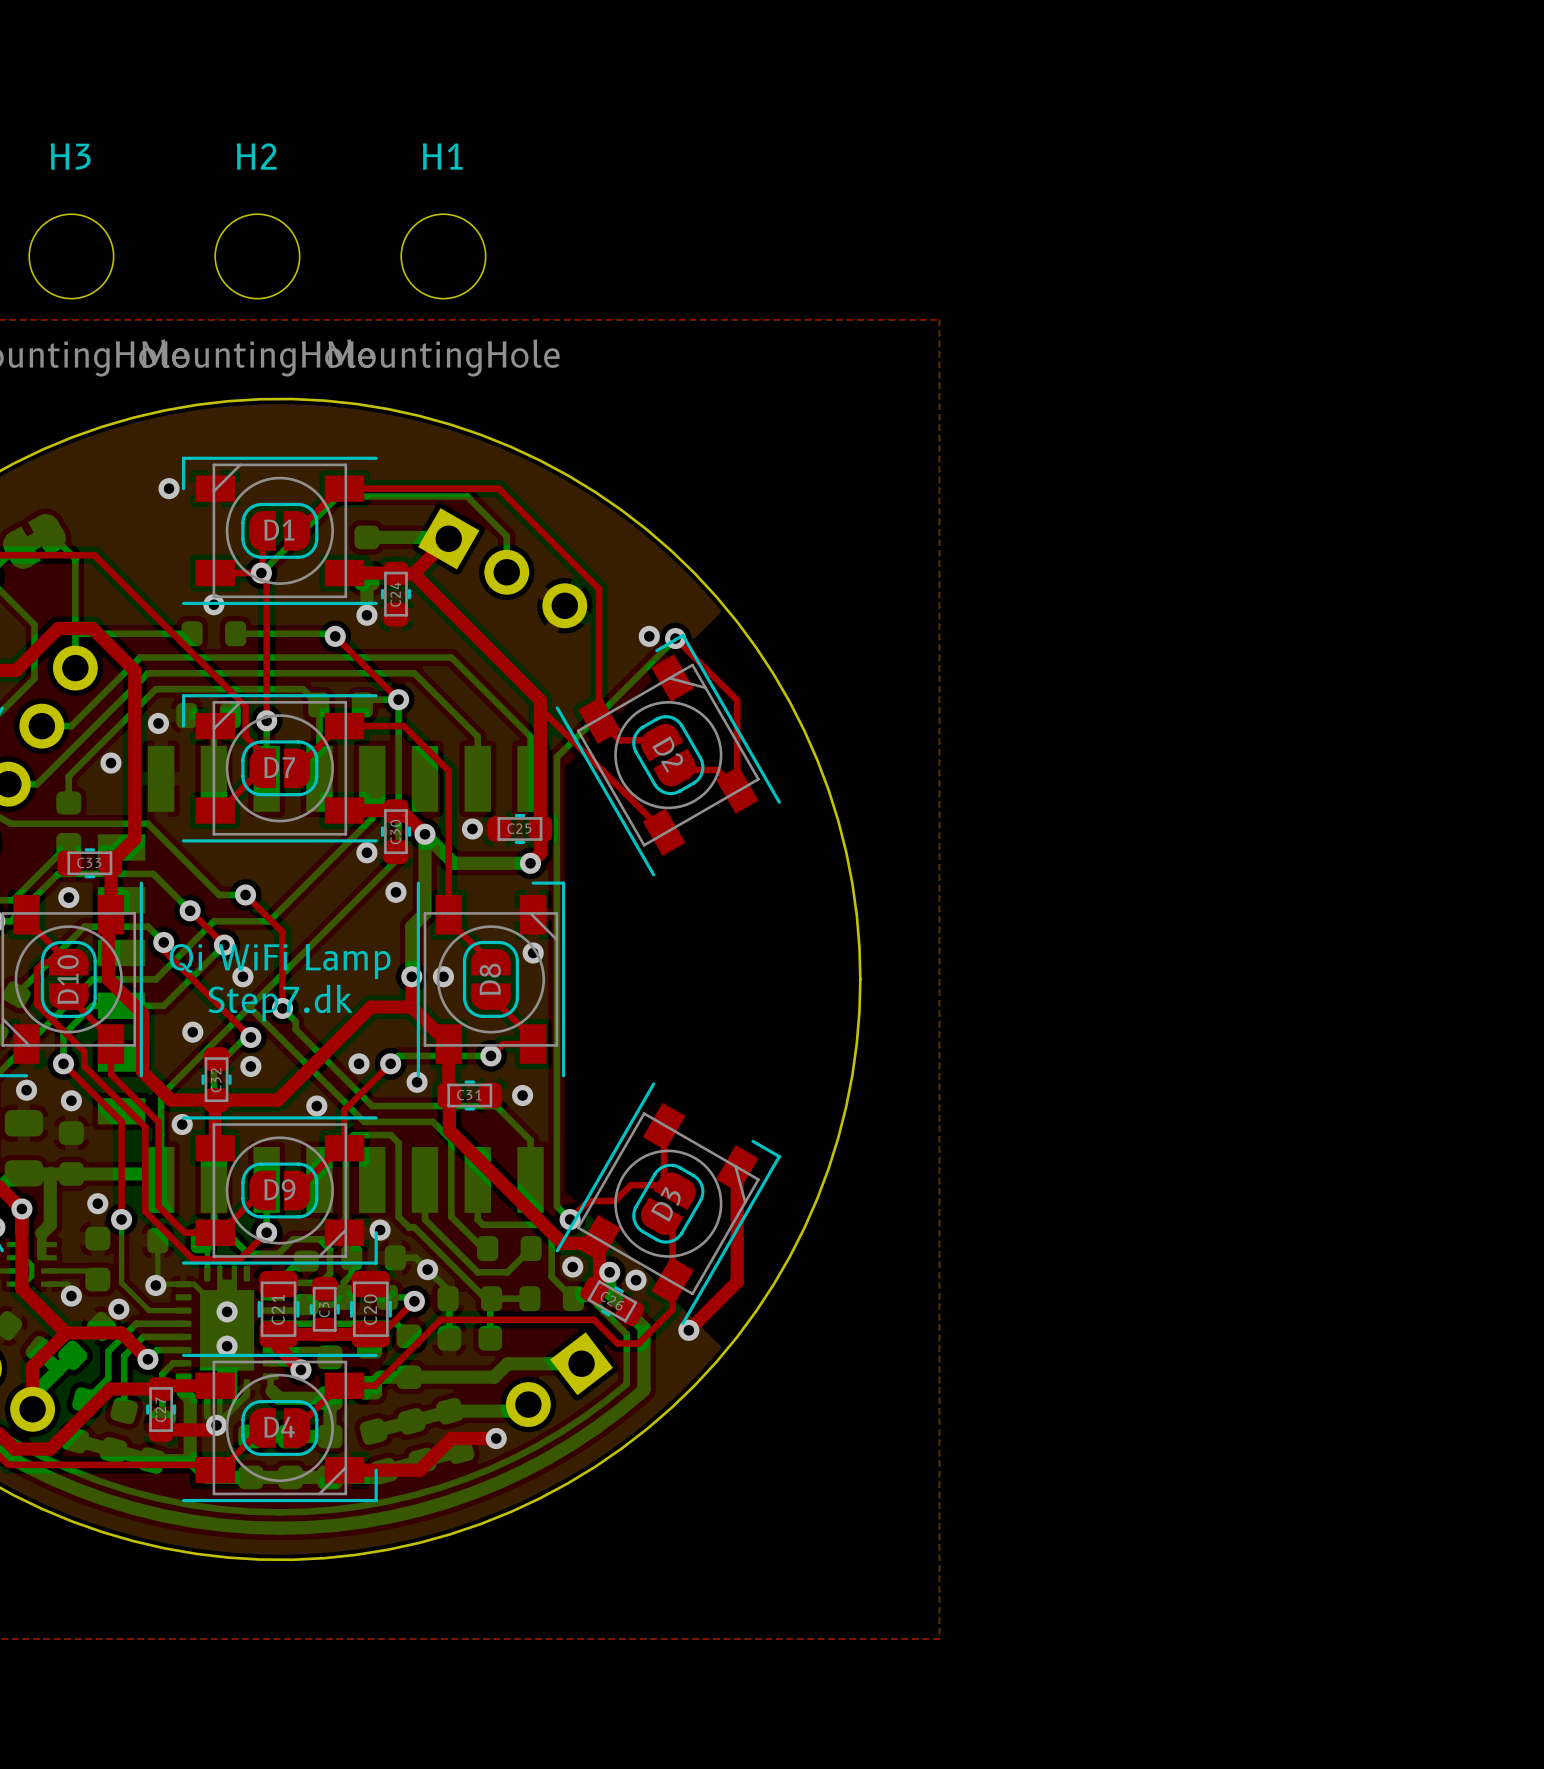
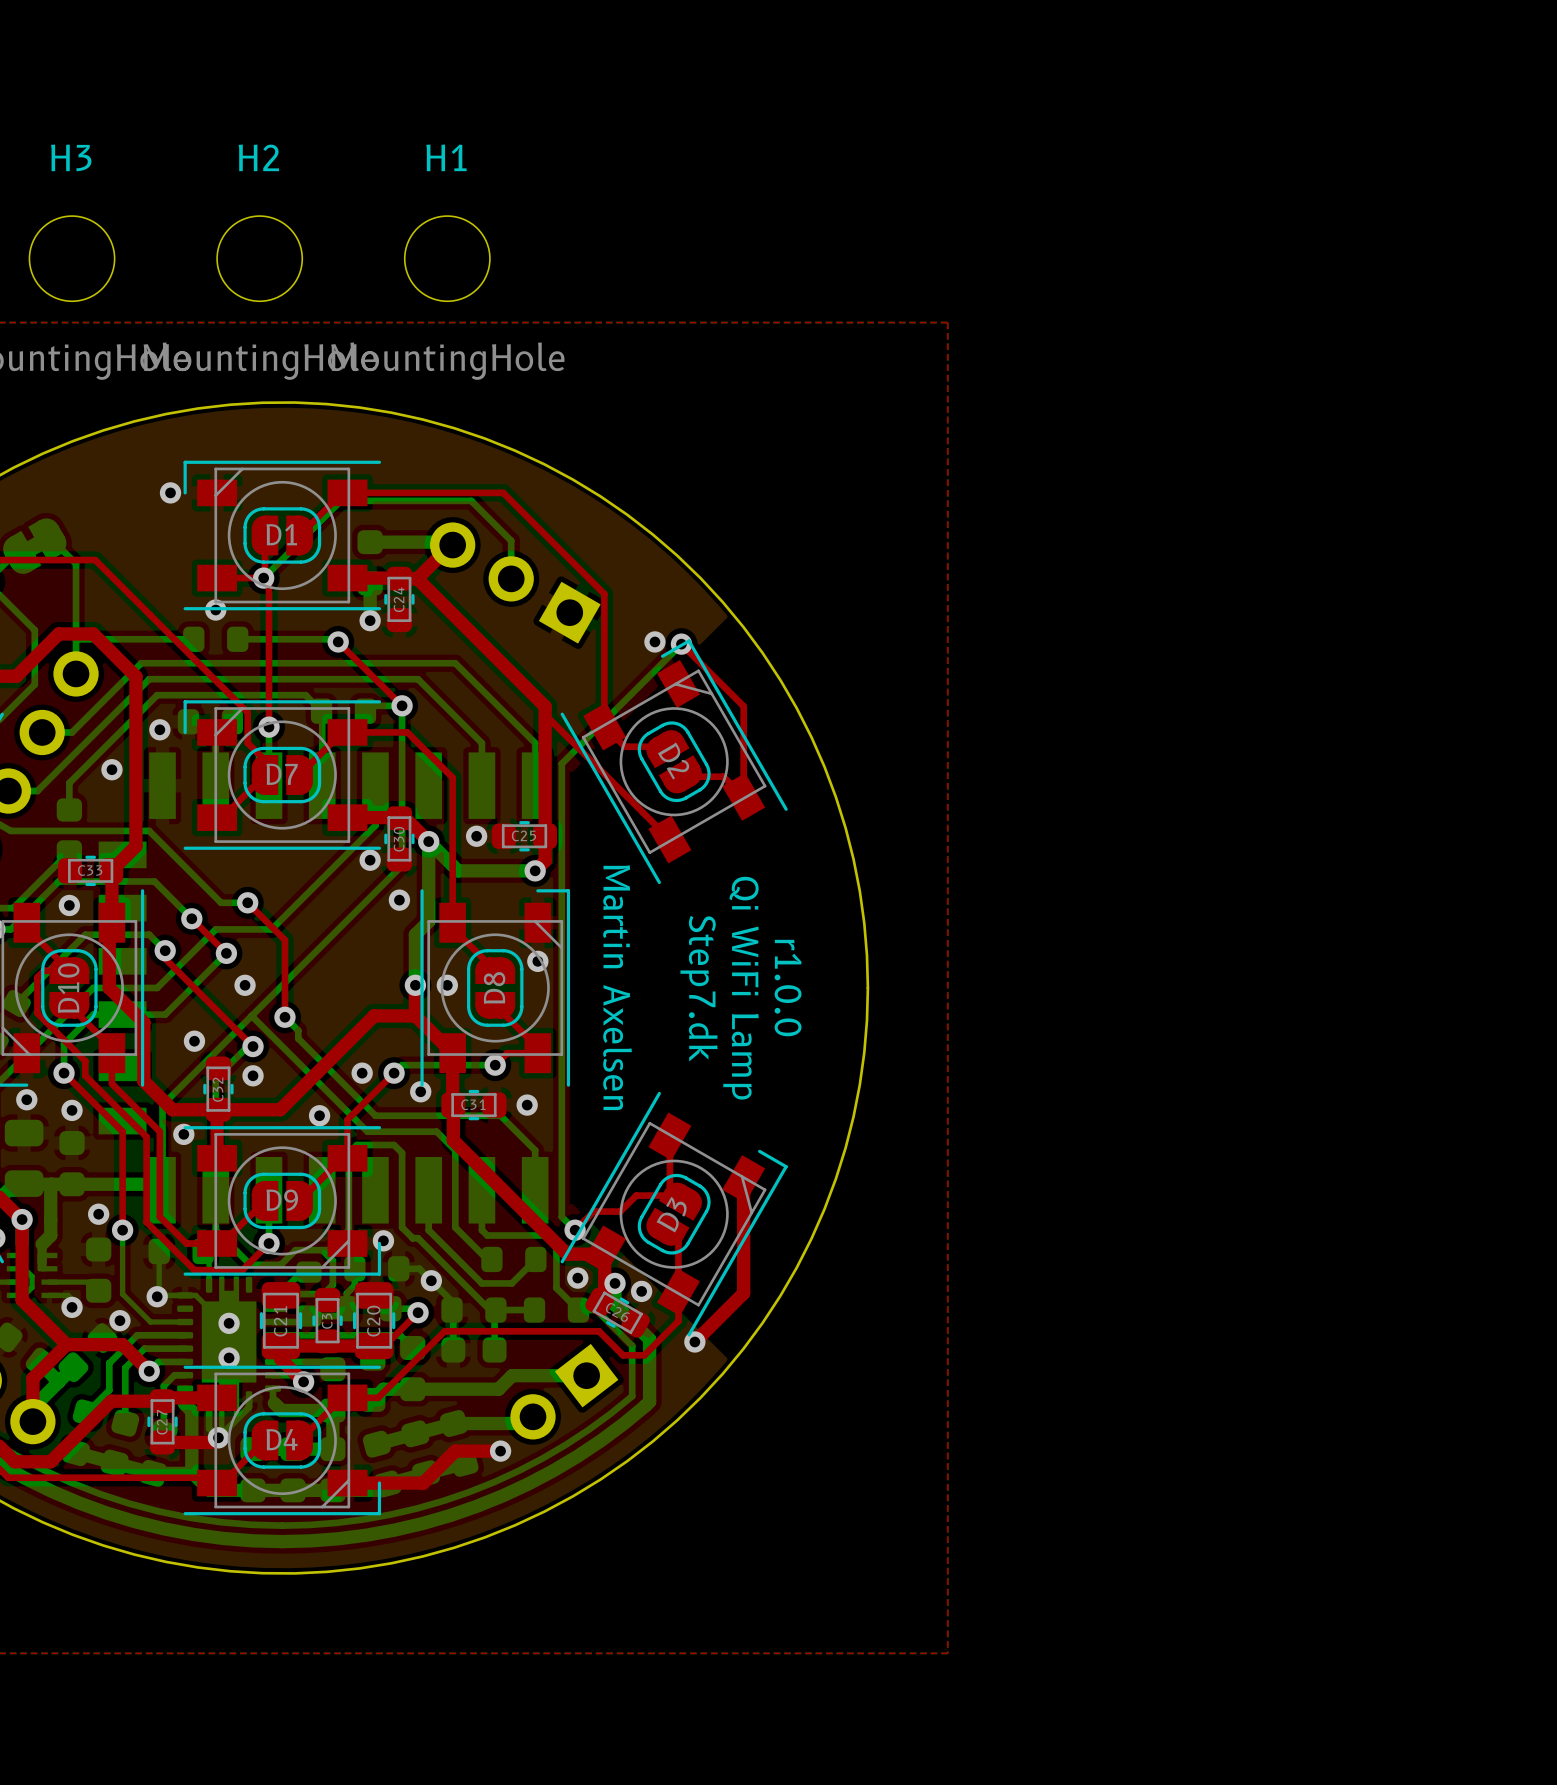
part rotation: 0° (502, 568) -> 180° (515, 583)
text rotation: 0° (280, 961) -> 90° clockwise (741, 988)
text position: Qi WiFi Lamp (280, 961) -> Qi WiFi Lamp (741, 988)
text: none -> Martin Axelsen (617, 987)
text: none -> r1.0.0 (788, 988)
text rotation: 0° (280, 1003) -> 90° clockwise (699, 988)
text position: Step7.dk (280, 1003) -> Step7.dk (699, 988)

